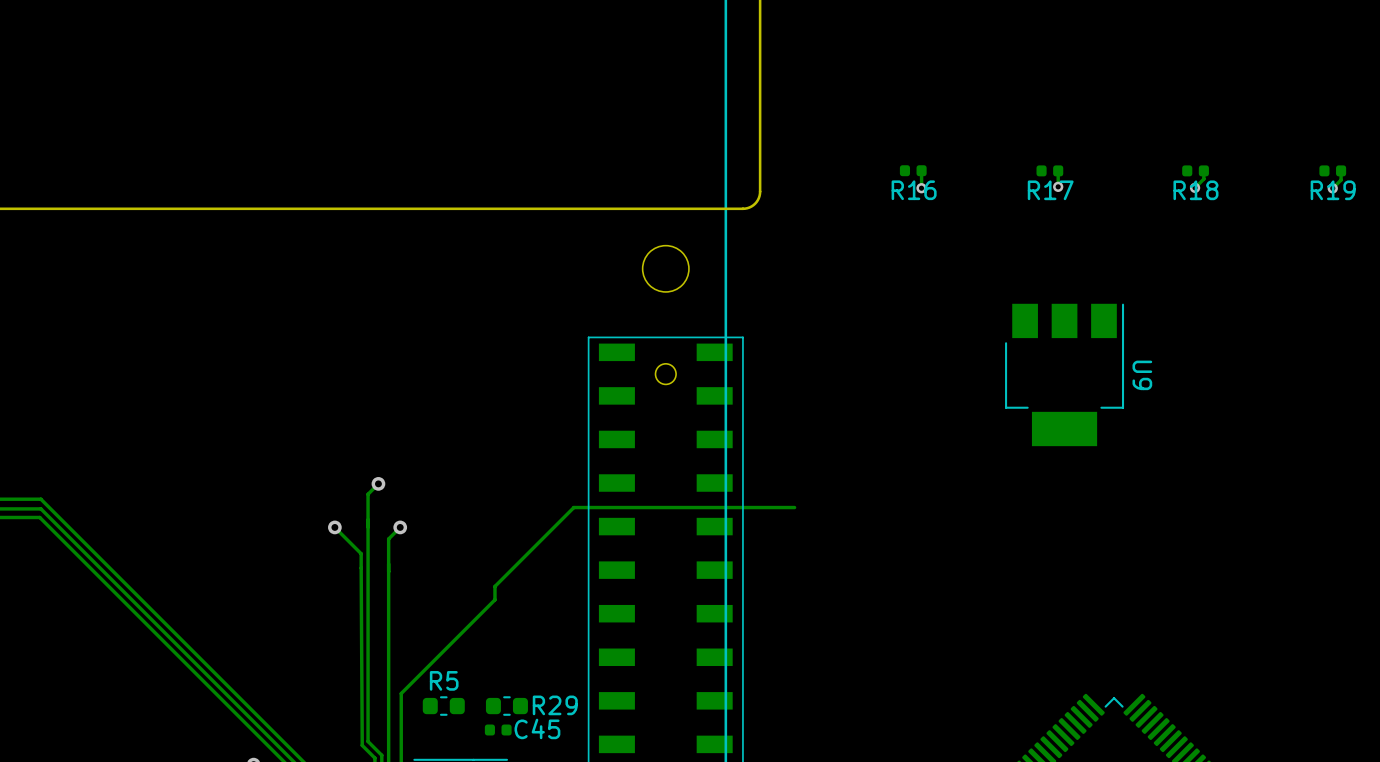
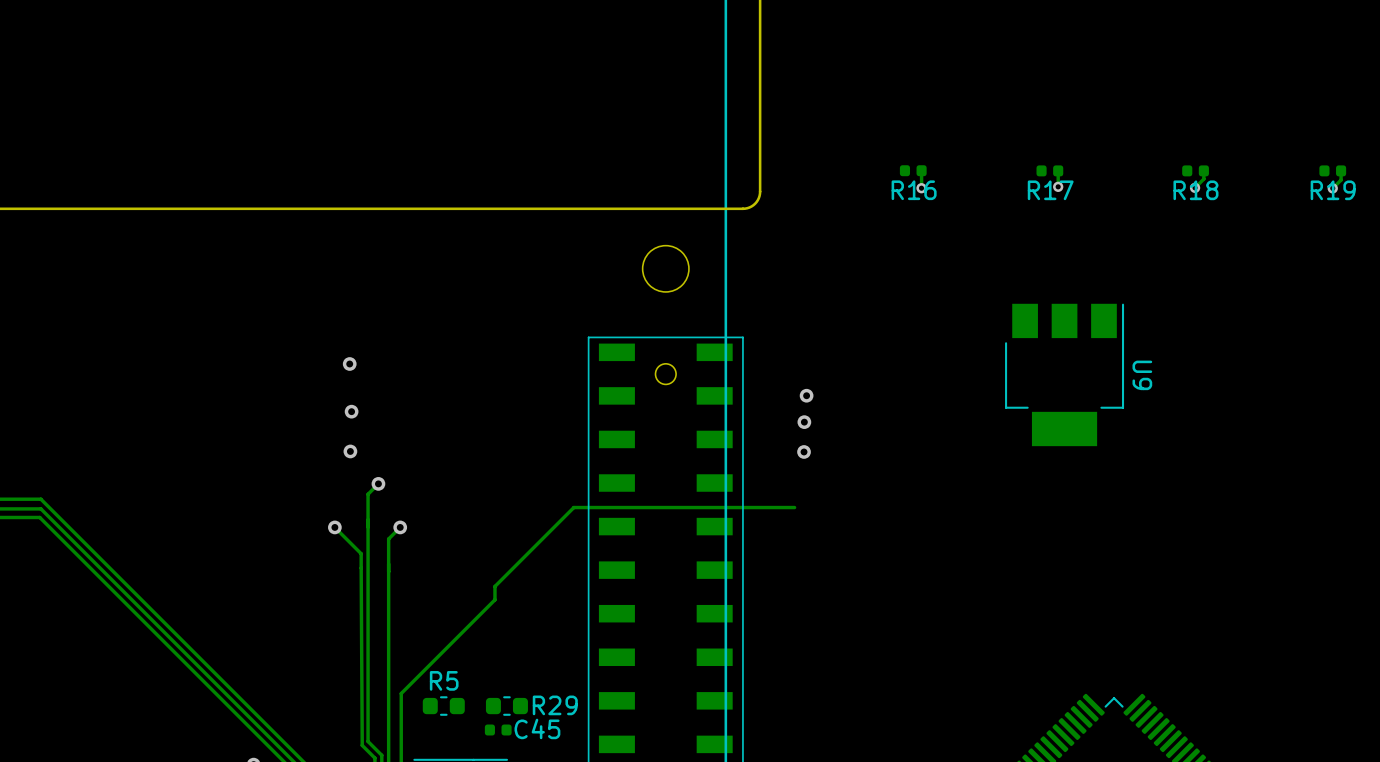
via: none -> (349, 363)
via: none -> (806, 395)
via: none -> (351, 411)
via: none -> (804, 422)
via: none -> (350, 451)
via: none -> (804, 451)

